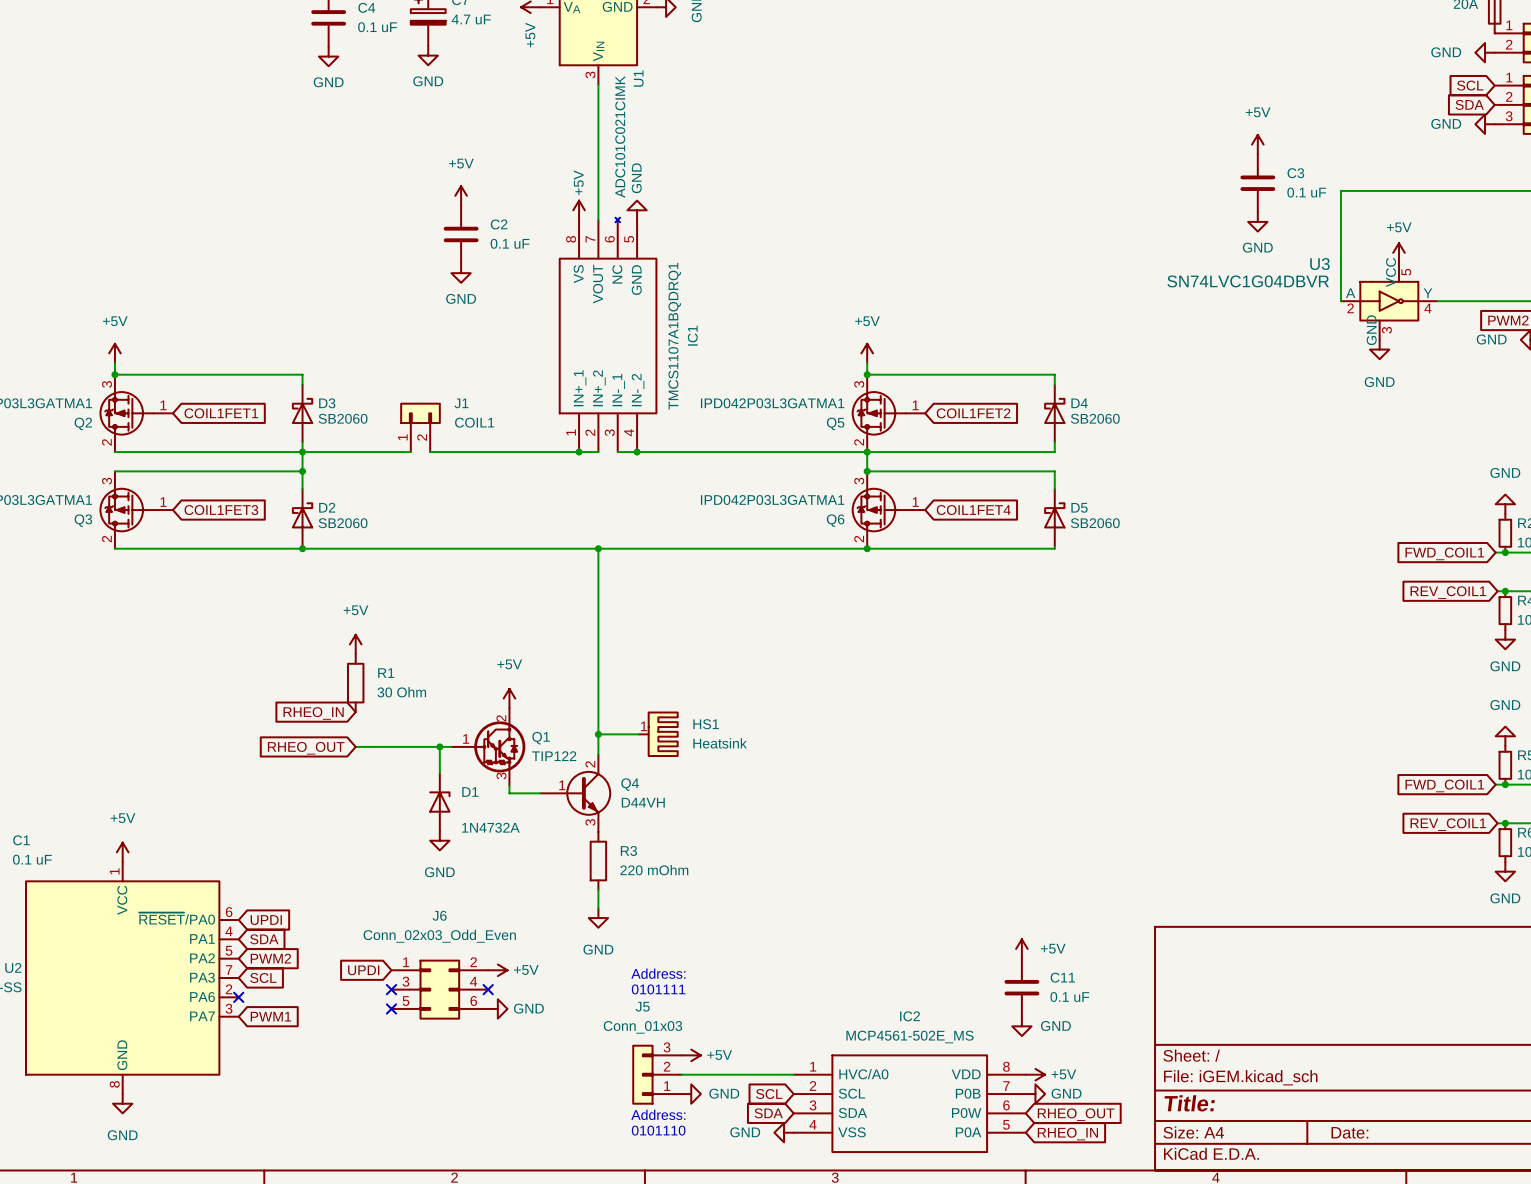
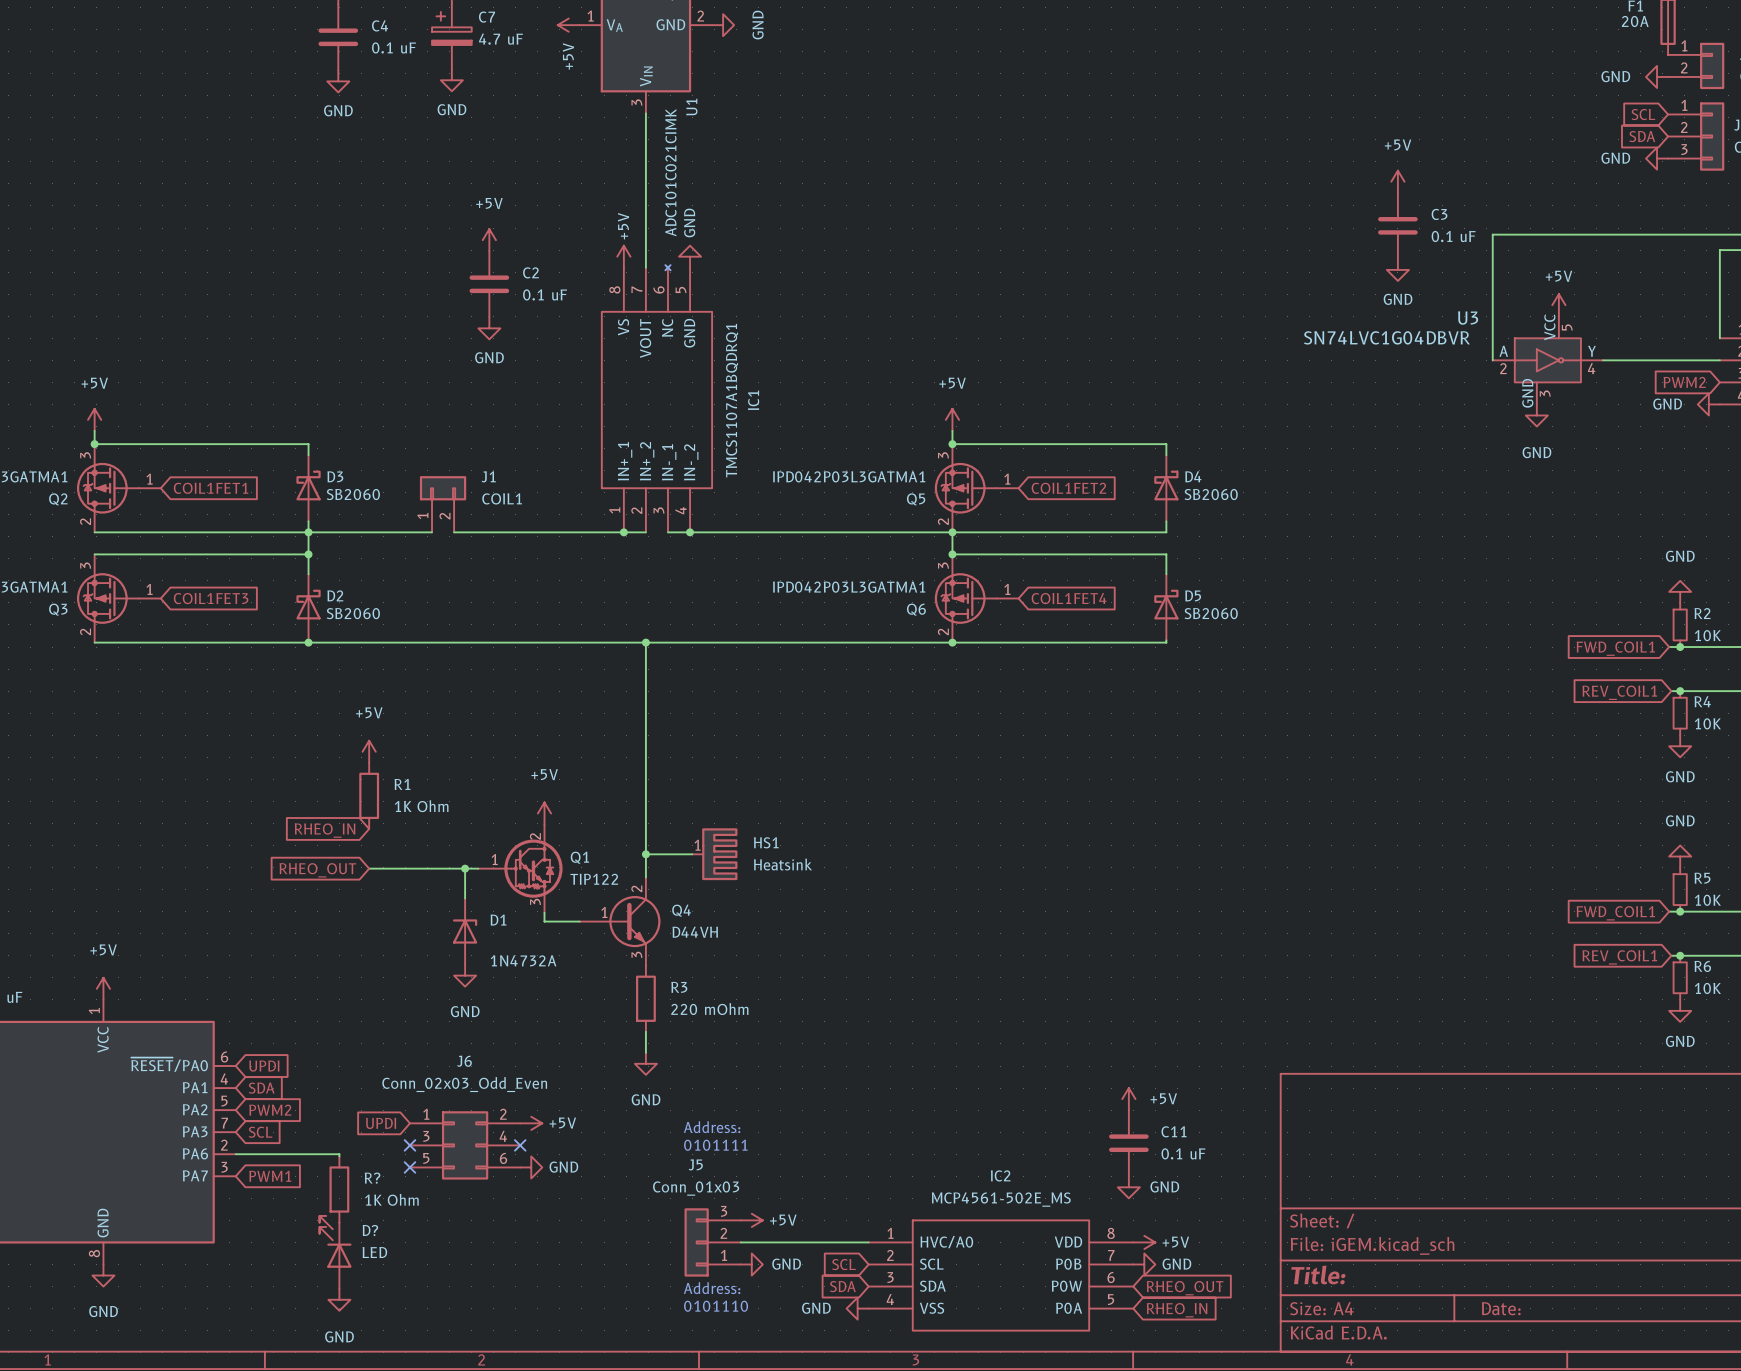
R1 value: 30 Ohm (401, 692) -> 1K Ohm (421, 806)
wire: none -> (235, 1154) (339, 1154) (339, 1156)
no-connect mark: (238, 997) -> none
R?: none -> 1K Ohm (339, 1189)
D?: none -> LED (335, 1252)
power symbol: none -> GND (339, 1299)

